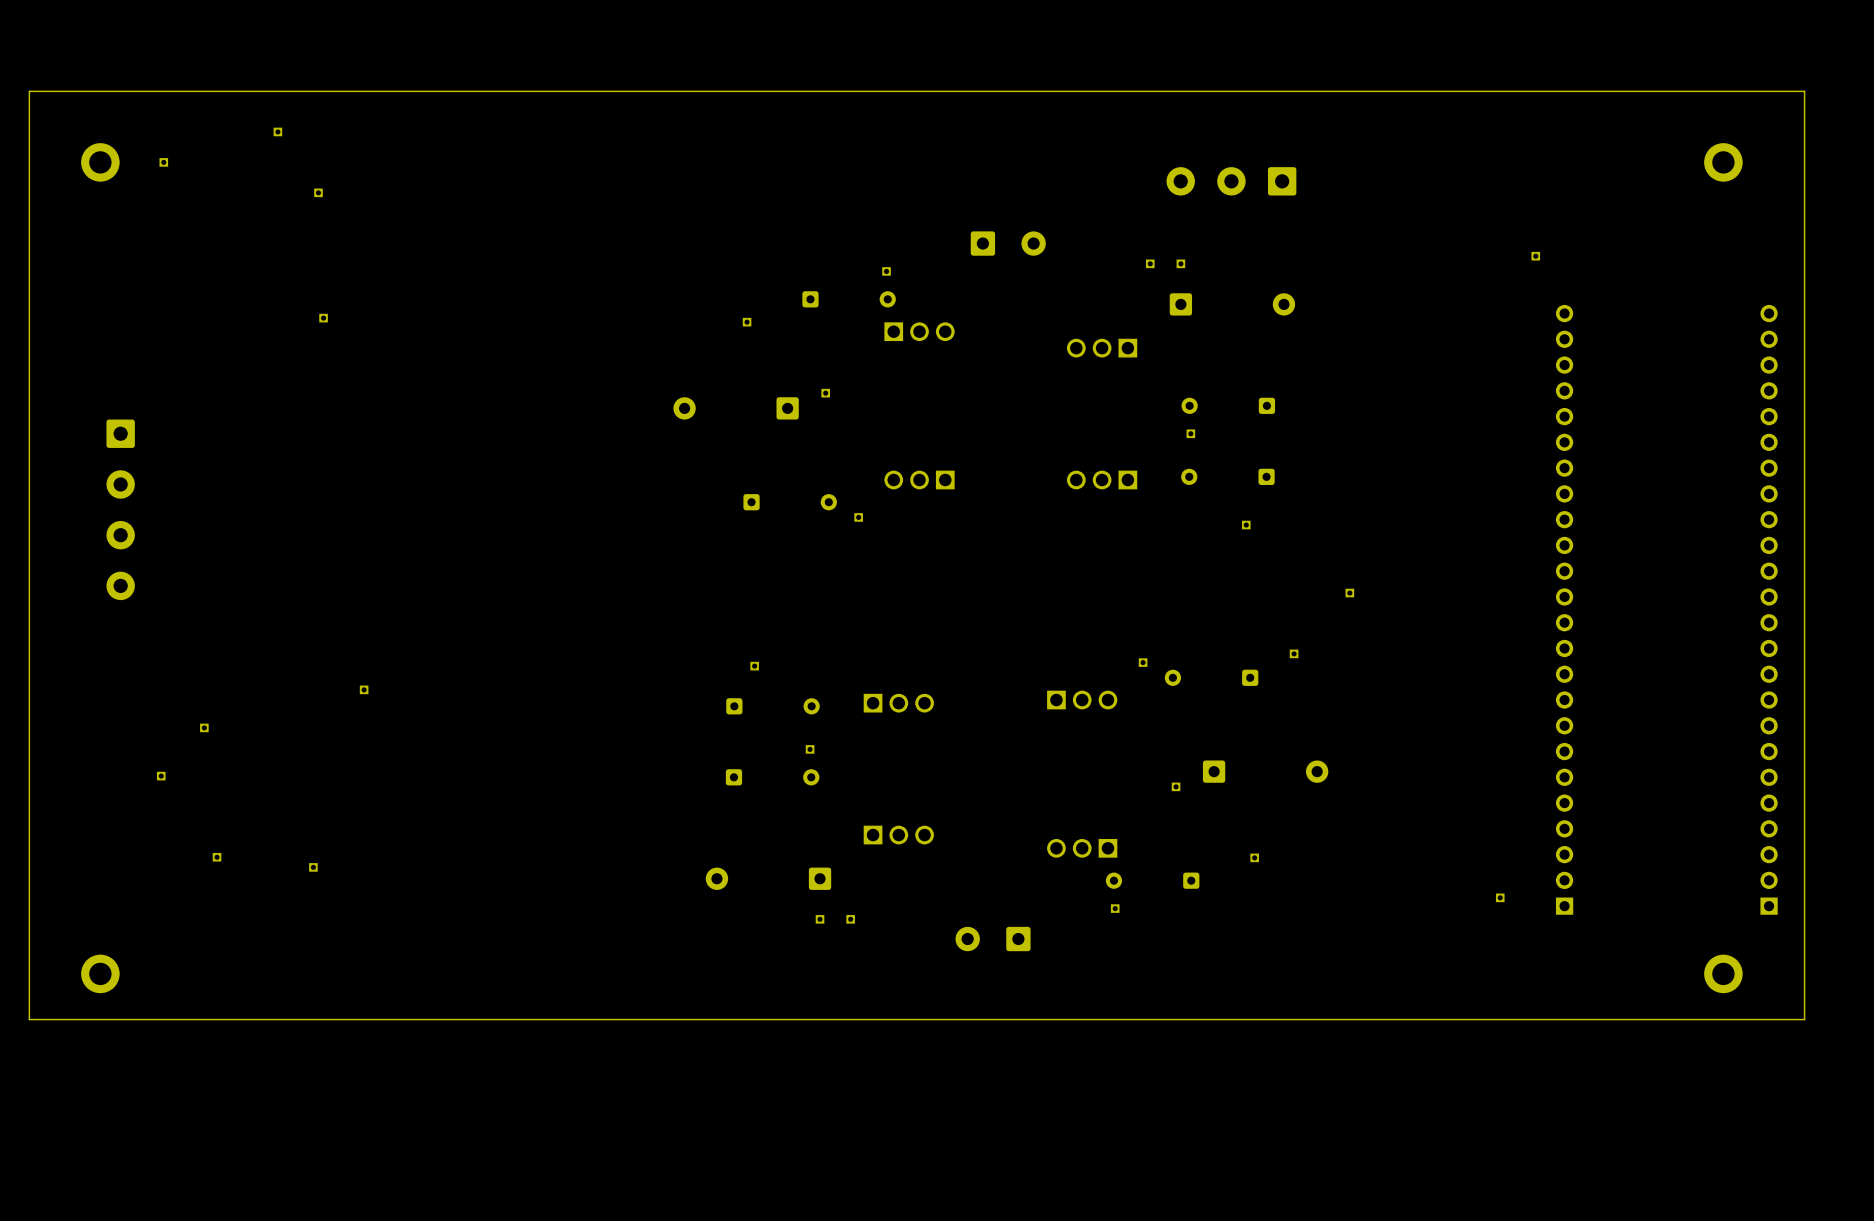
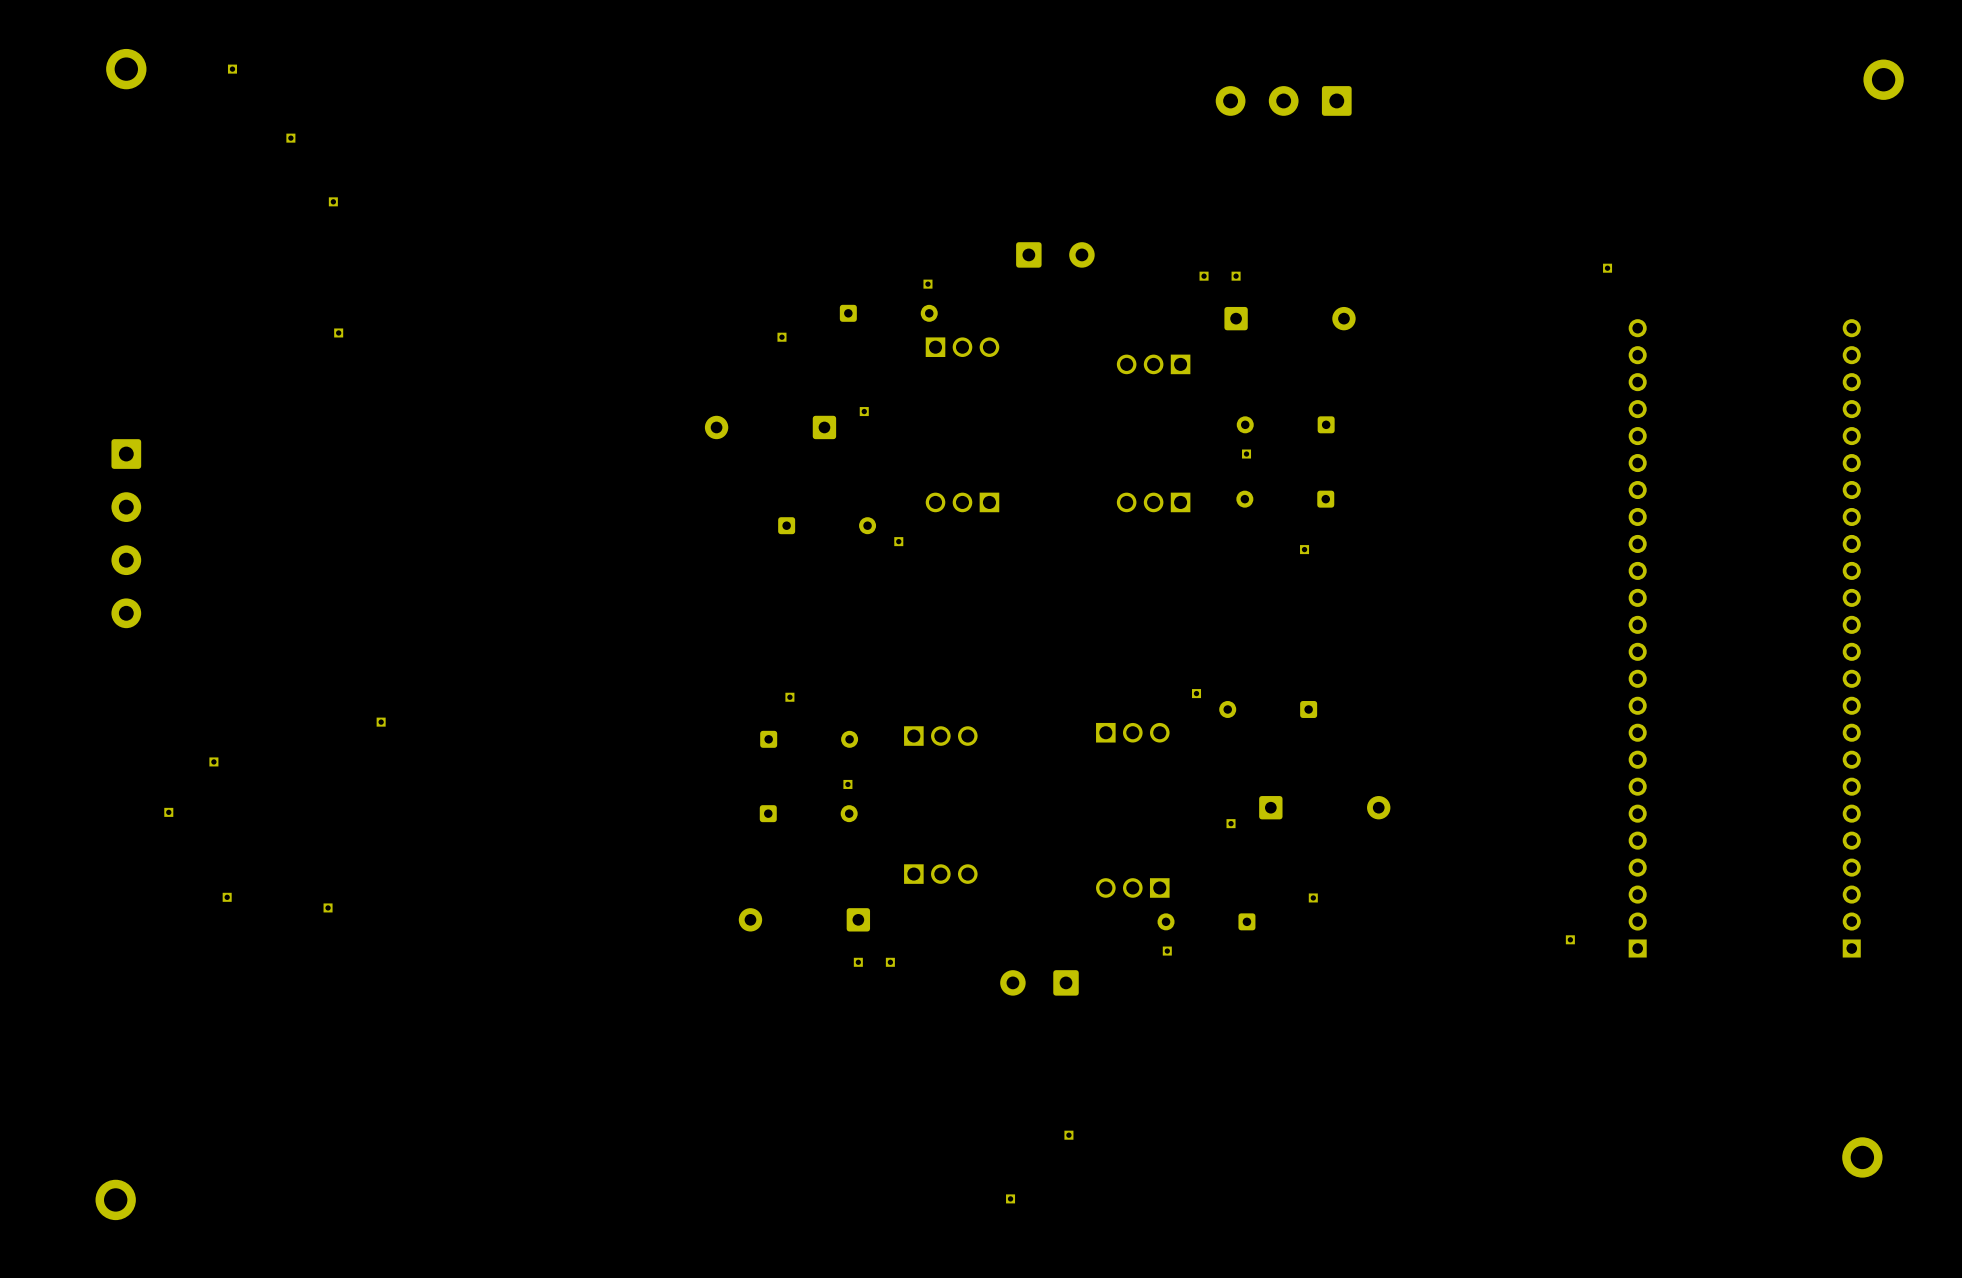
board edge: (1804, 91) (29, 91) (29, 1019) (1804, 1019) (1804, 91) -> none
part position: (100, 162) -> (126, 69)
part position: (163, 162) -> (232, 69)
part position: (1723, 162) -> (1883, 79)
part position: (1231, 181) -> (1283, 100)
part: (1349, 593) -> none
part: (1294, 653) -> none
part position: (100, 973) -> (115, 1199)
part position: (1723, 973) -> (1862, 1157)
part: none -> (1068, 1135)
part: none -> (1010, 1198)

